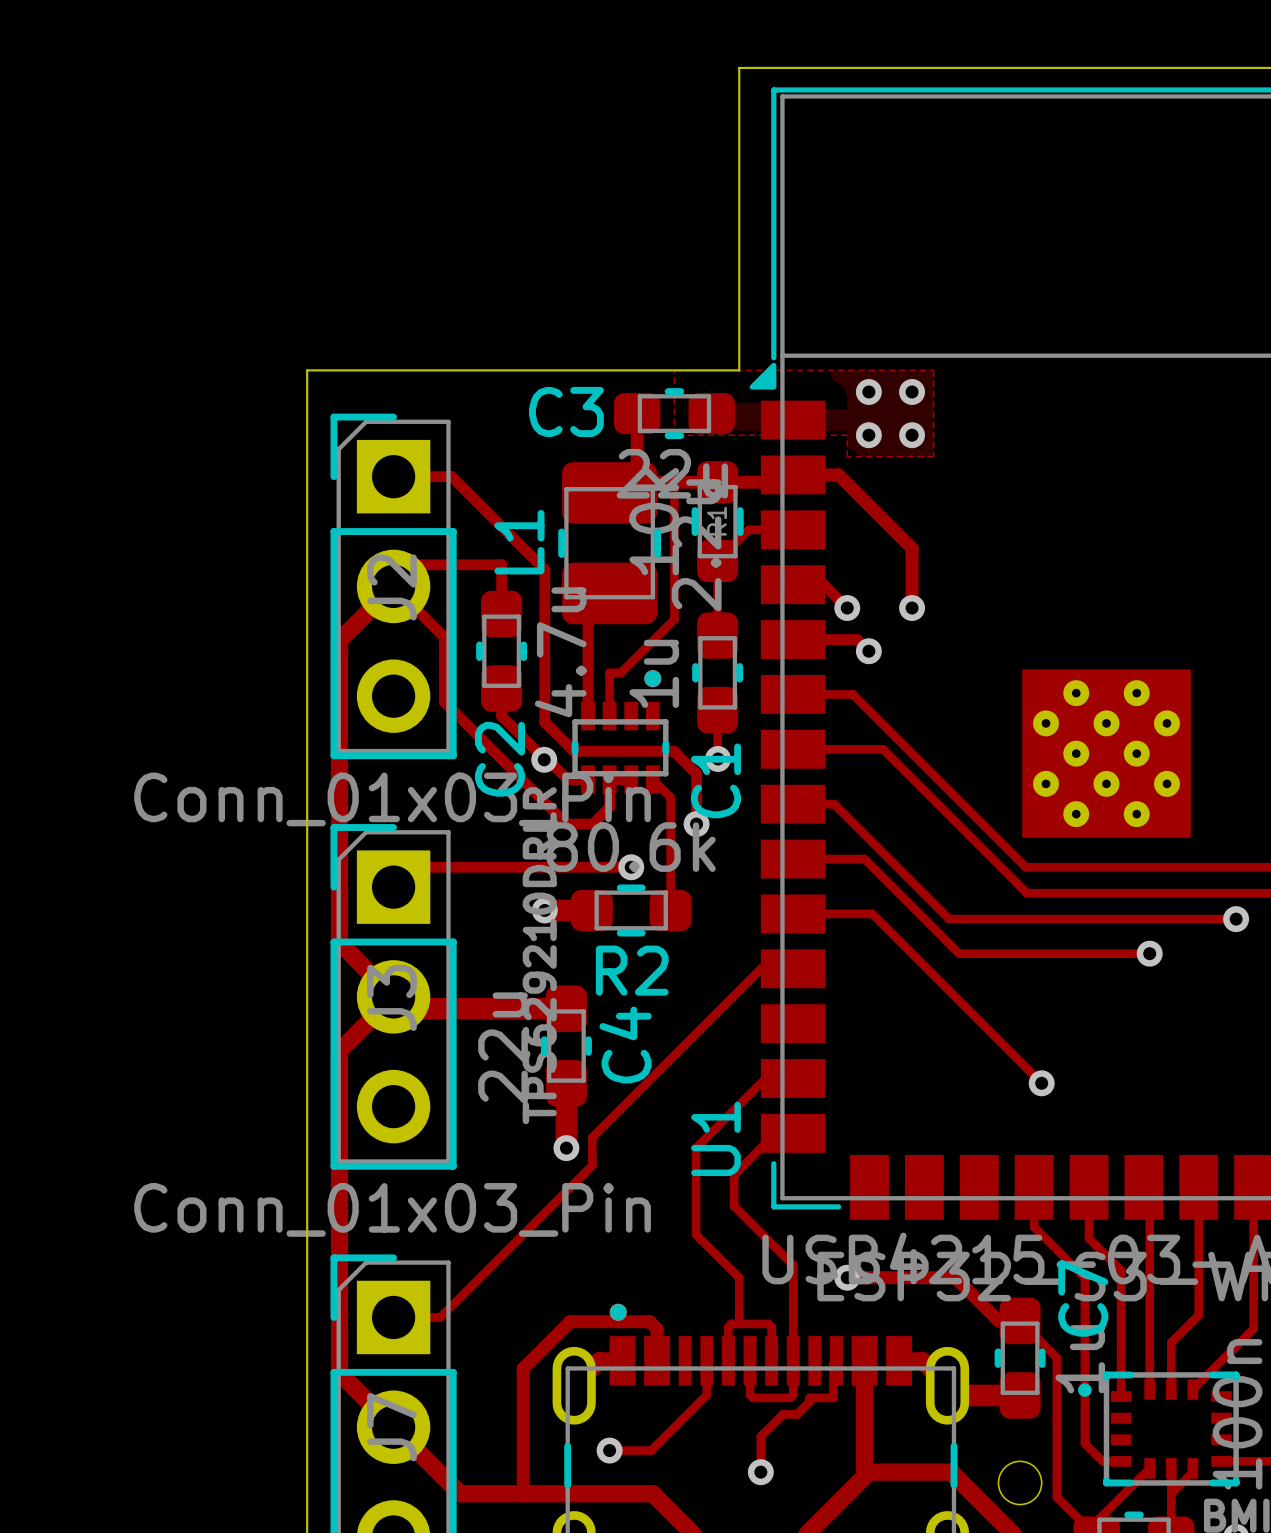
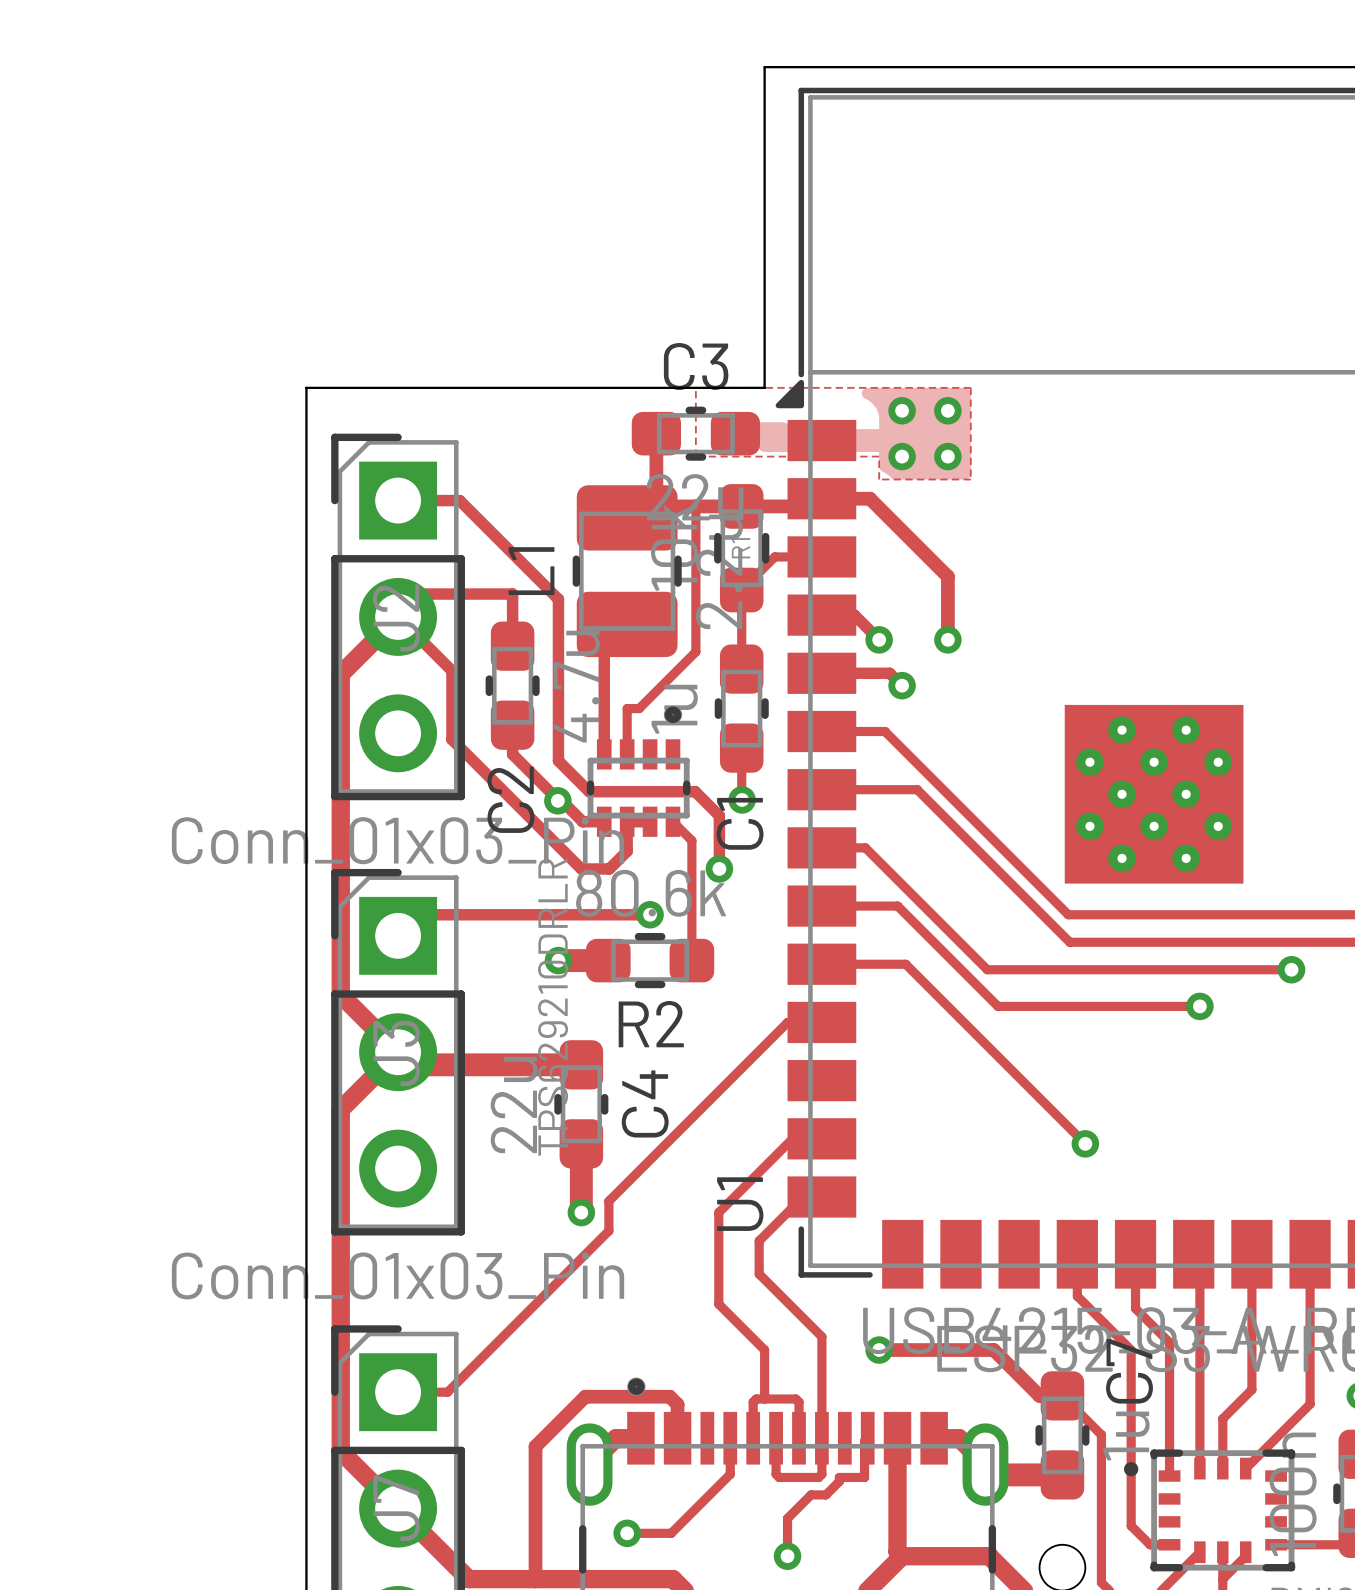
C3 name position: C3 (566, 411) -> C3 (696, 366)

